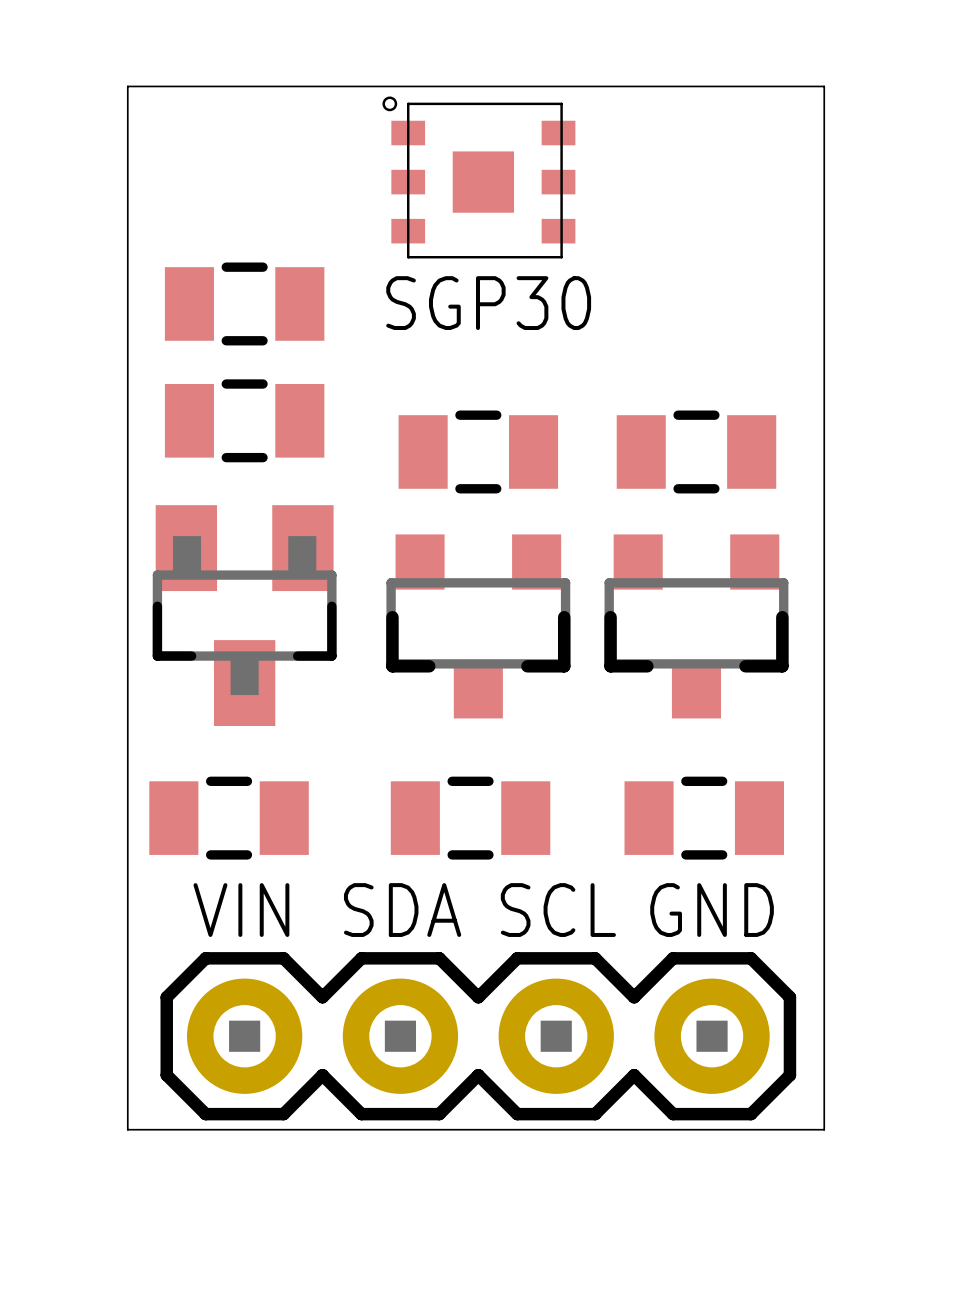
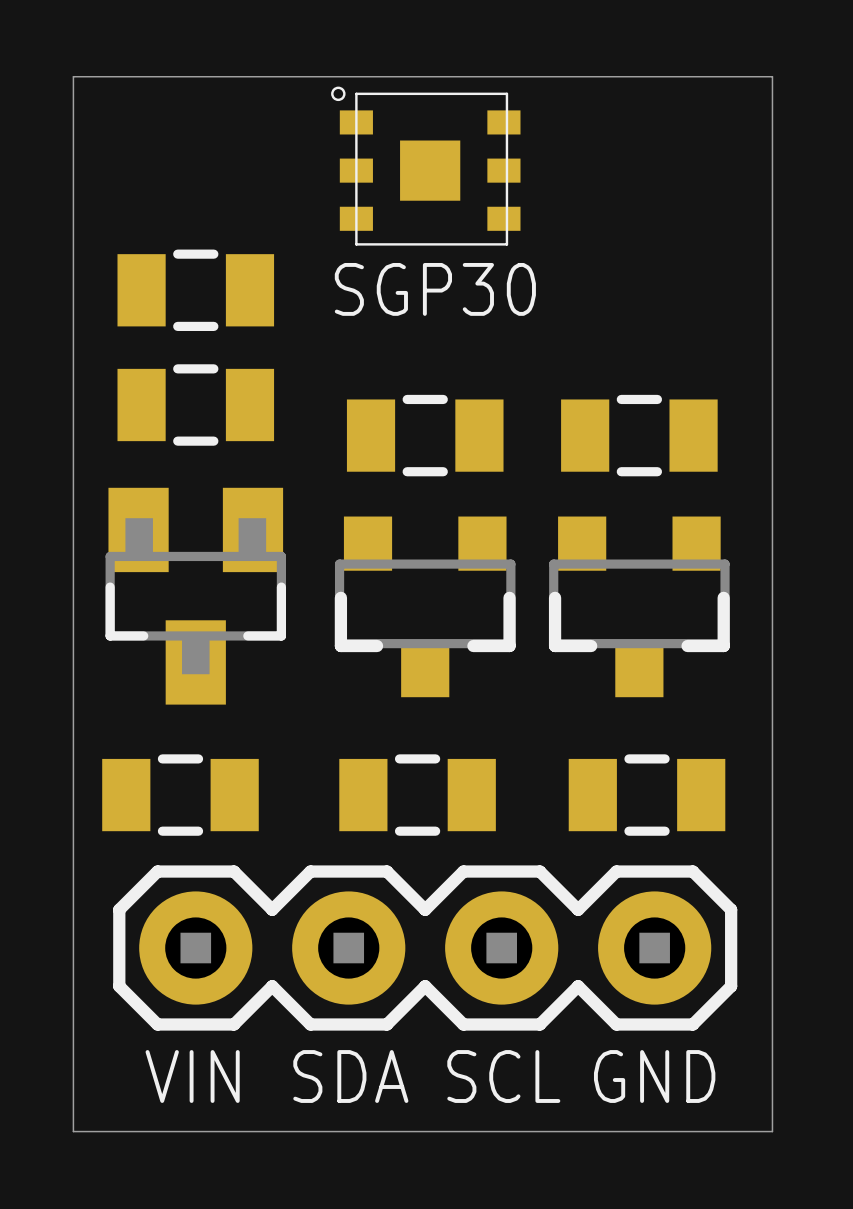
board edge: (127, 86) (127, 1129) (824, 1129) (824, 86) -> (81, 76) (73, 76) (73, 1131) (772, 1131) (772, 76) (764, 76)
text position: VIN (241, 910) -> VIN (192, 1076)
text position: SDA (402, 910) -> SDA (350, 1076)
text position: SCL (558, 910) -> SCL (503, 1076)
text position: GND (712, 910) -> GND (654, 1076)
part position: (478, 1036) -> (425, 948)

